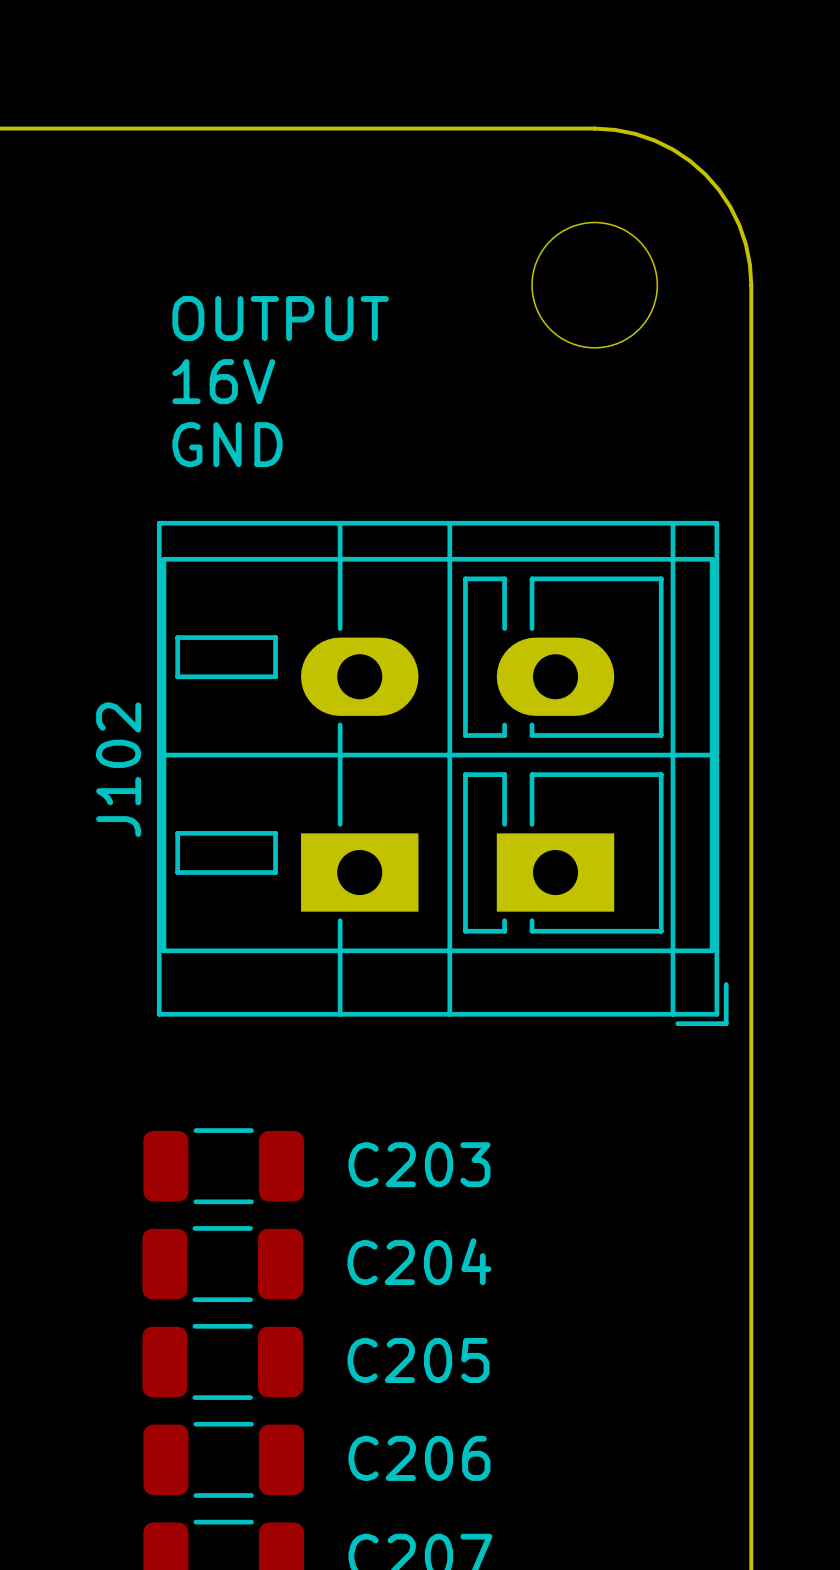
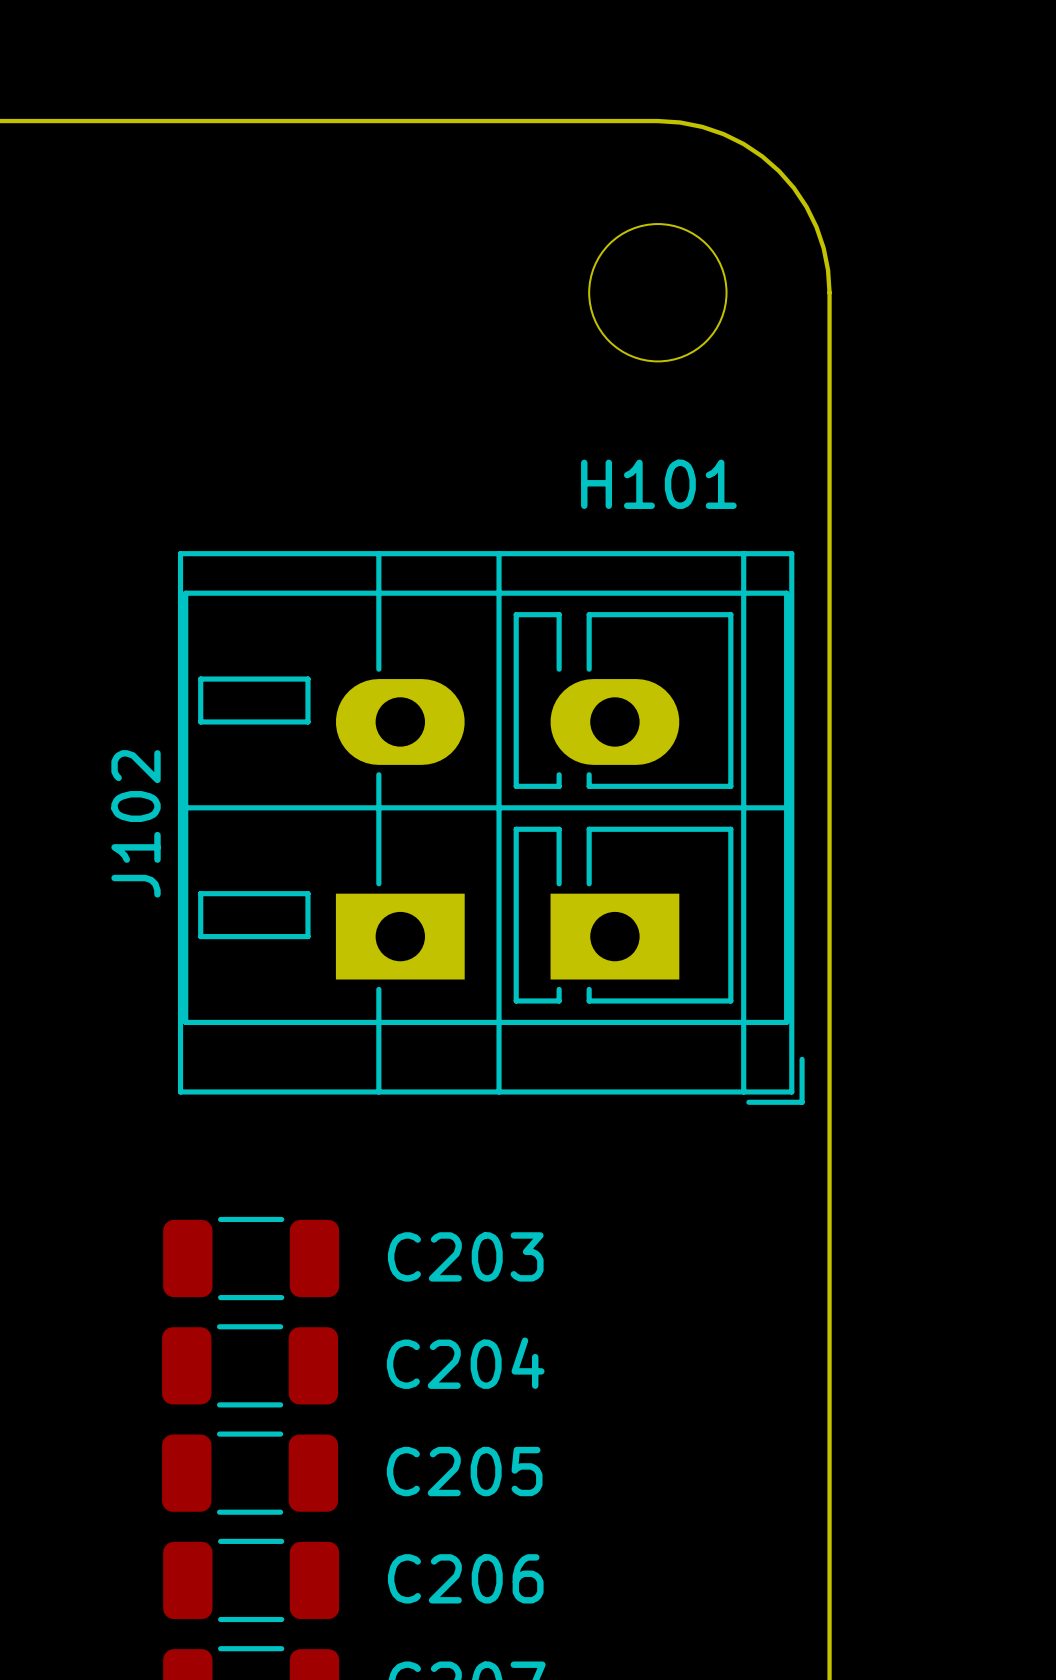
text: OUTPUT (280, 318) -> none
text: 16V (223, 381) -> none
text: GND (227, 444) -> none
H101 name: none -> H101 (658, 484)

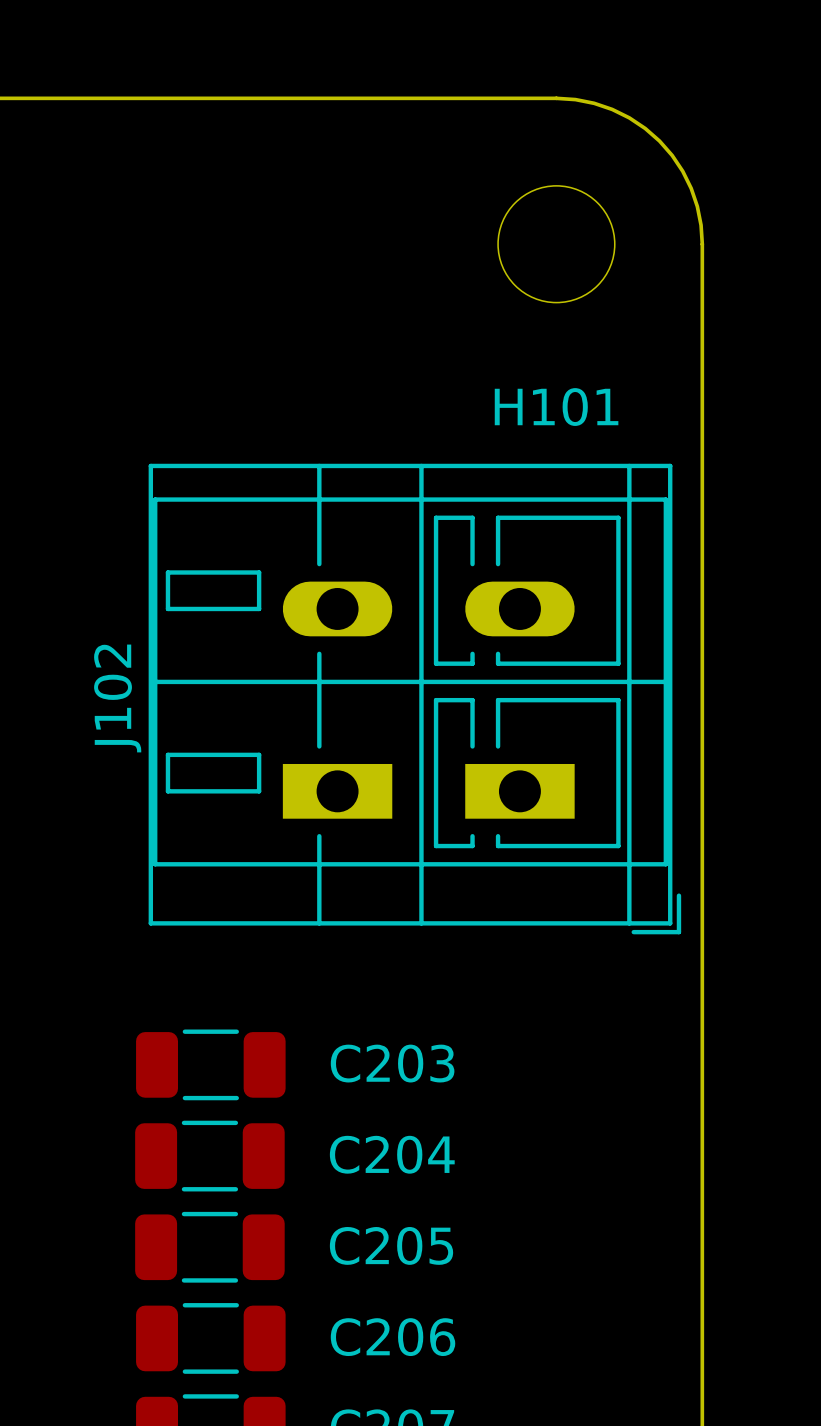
J102 footprint: [177, 551, 805, 1105] -> [148, 463, 682, 935]

